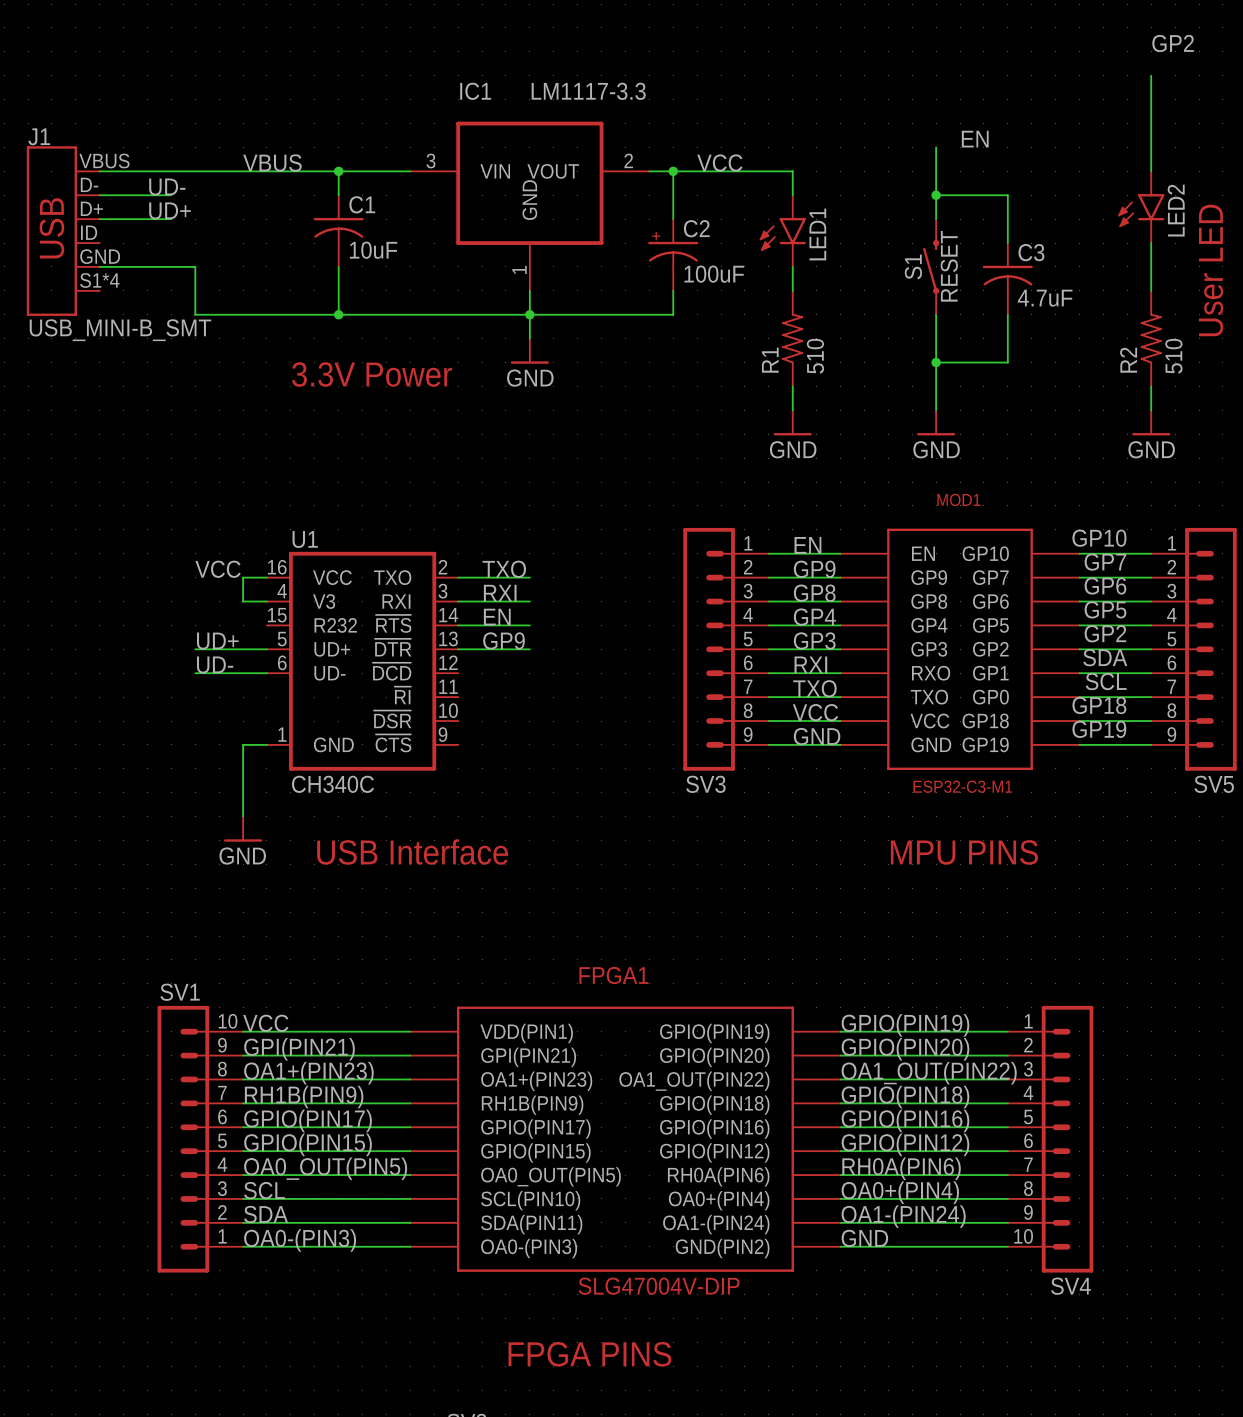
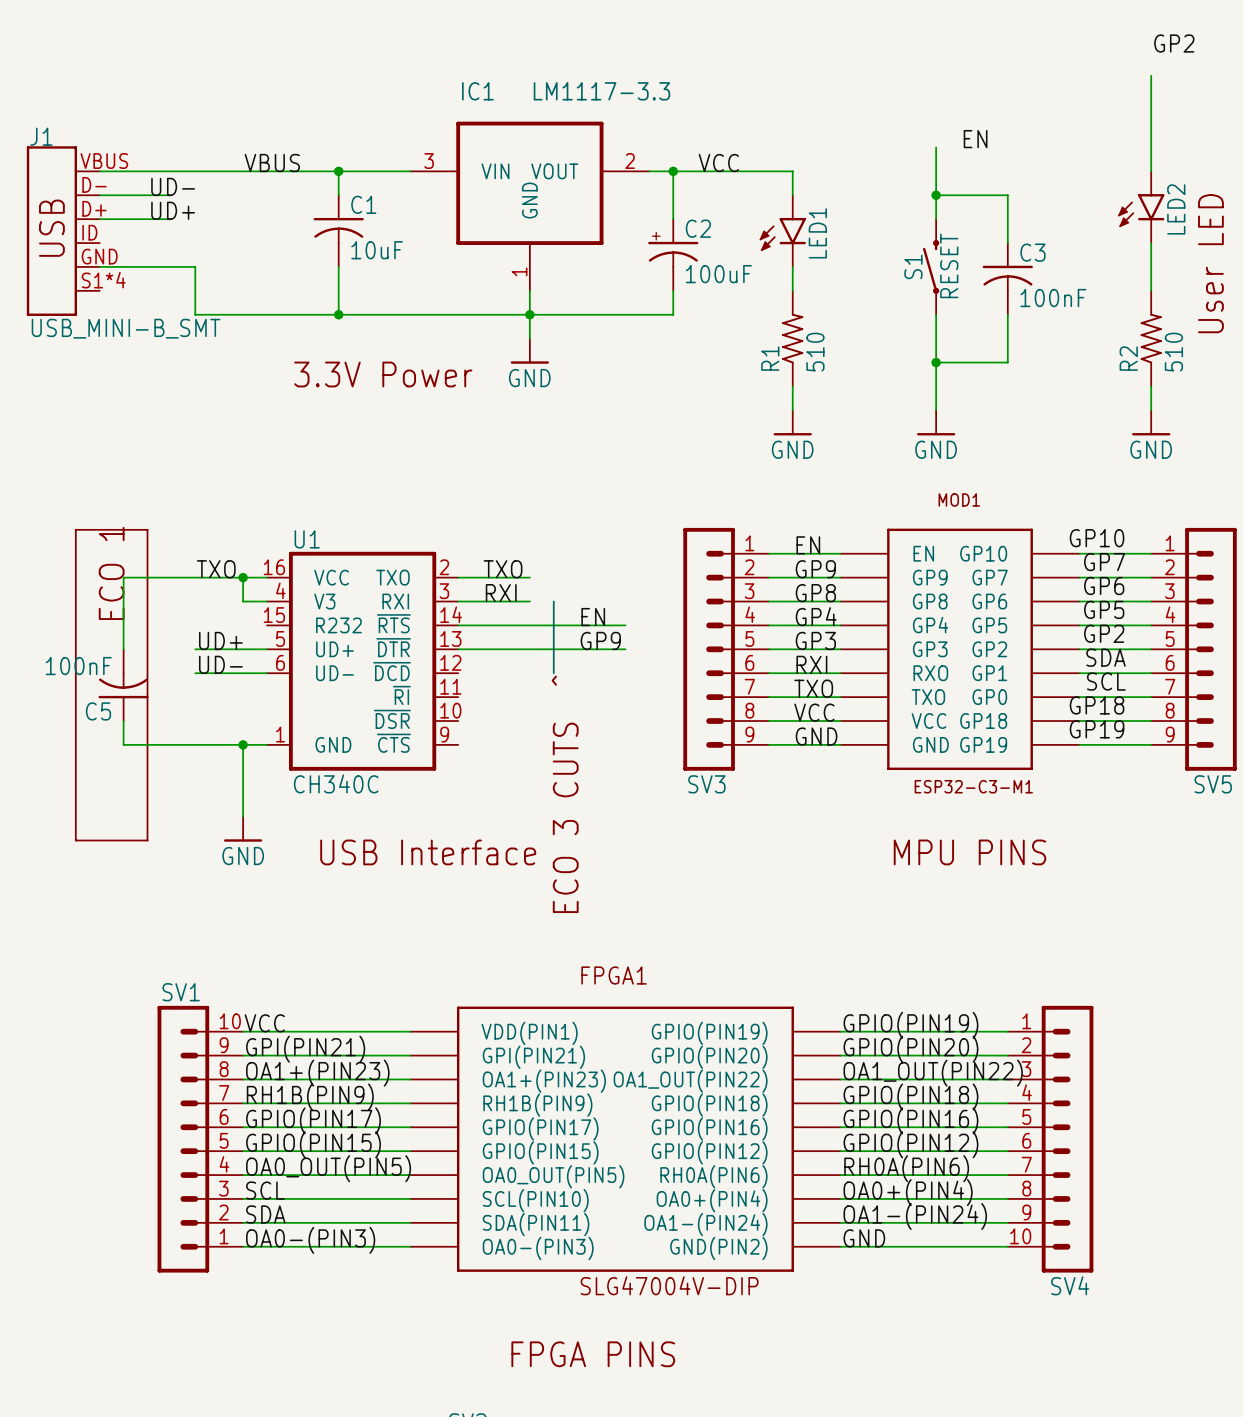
C3 value: 4.7uF (1045, 298) -> 100nF (1053, 298)
line: none -> (75, 529) (75, 840) (147, 840) (147, 529) (75, 529)
label: VCC (218, 569) -> TXO (216, 569)
text: none -> ECO 1 (111, 573)
wire: none -> (243, 577) (123, 577) (123, 649)
junction: none -> (243, 577)
line: none -> (553, 601) (553, 673)
label position: EN (497, 617) -> EN (593, 617)
wire: none -> (529, 625) (625, 625)
label position: GP9 (504, 640) -> GP9 (600, 640)
wire: none -> (529, 649) (625, 649)
C5: none -> 100nF (123, 685)
wire: none -> (123, 721) (123, 744) (243, 744)
junction: none -> (243, 744)
text: none -> ECO 3 CUTS ^ (565, 794)

